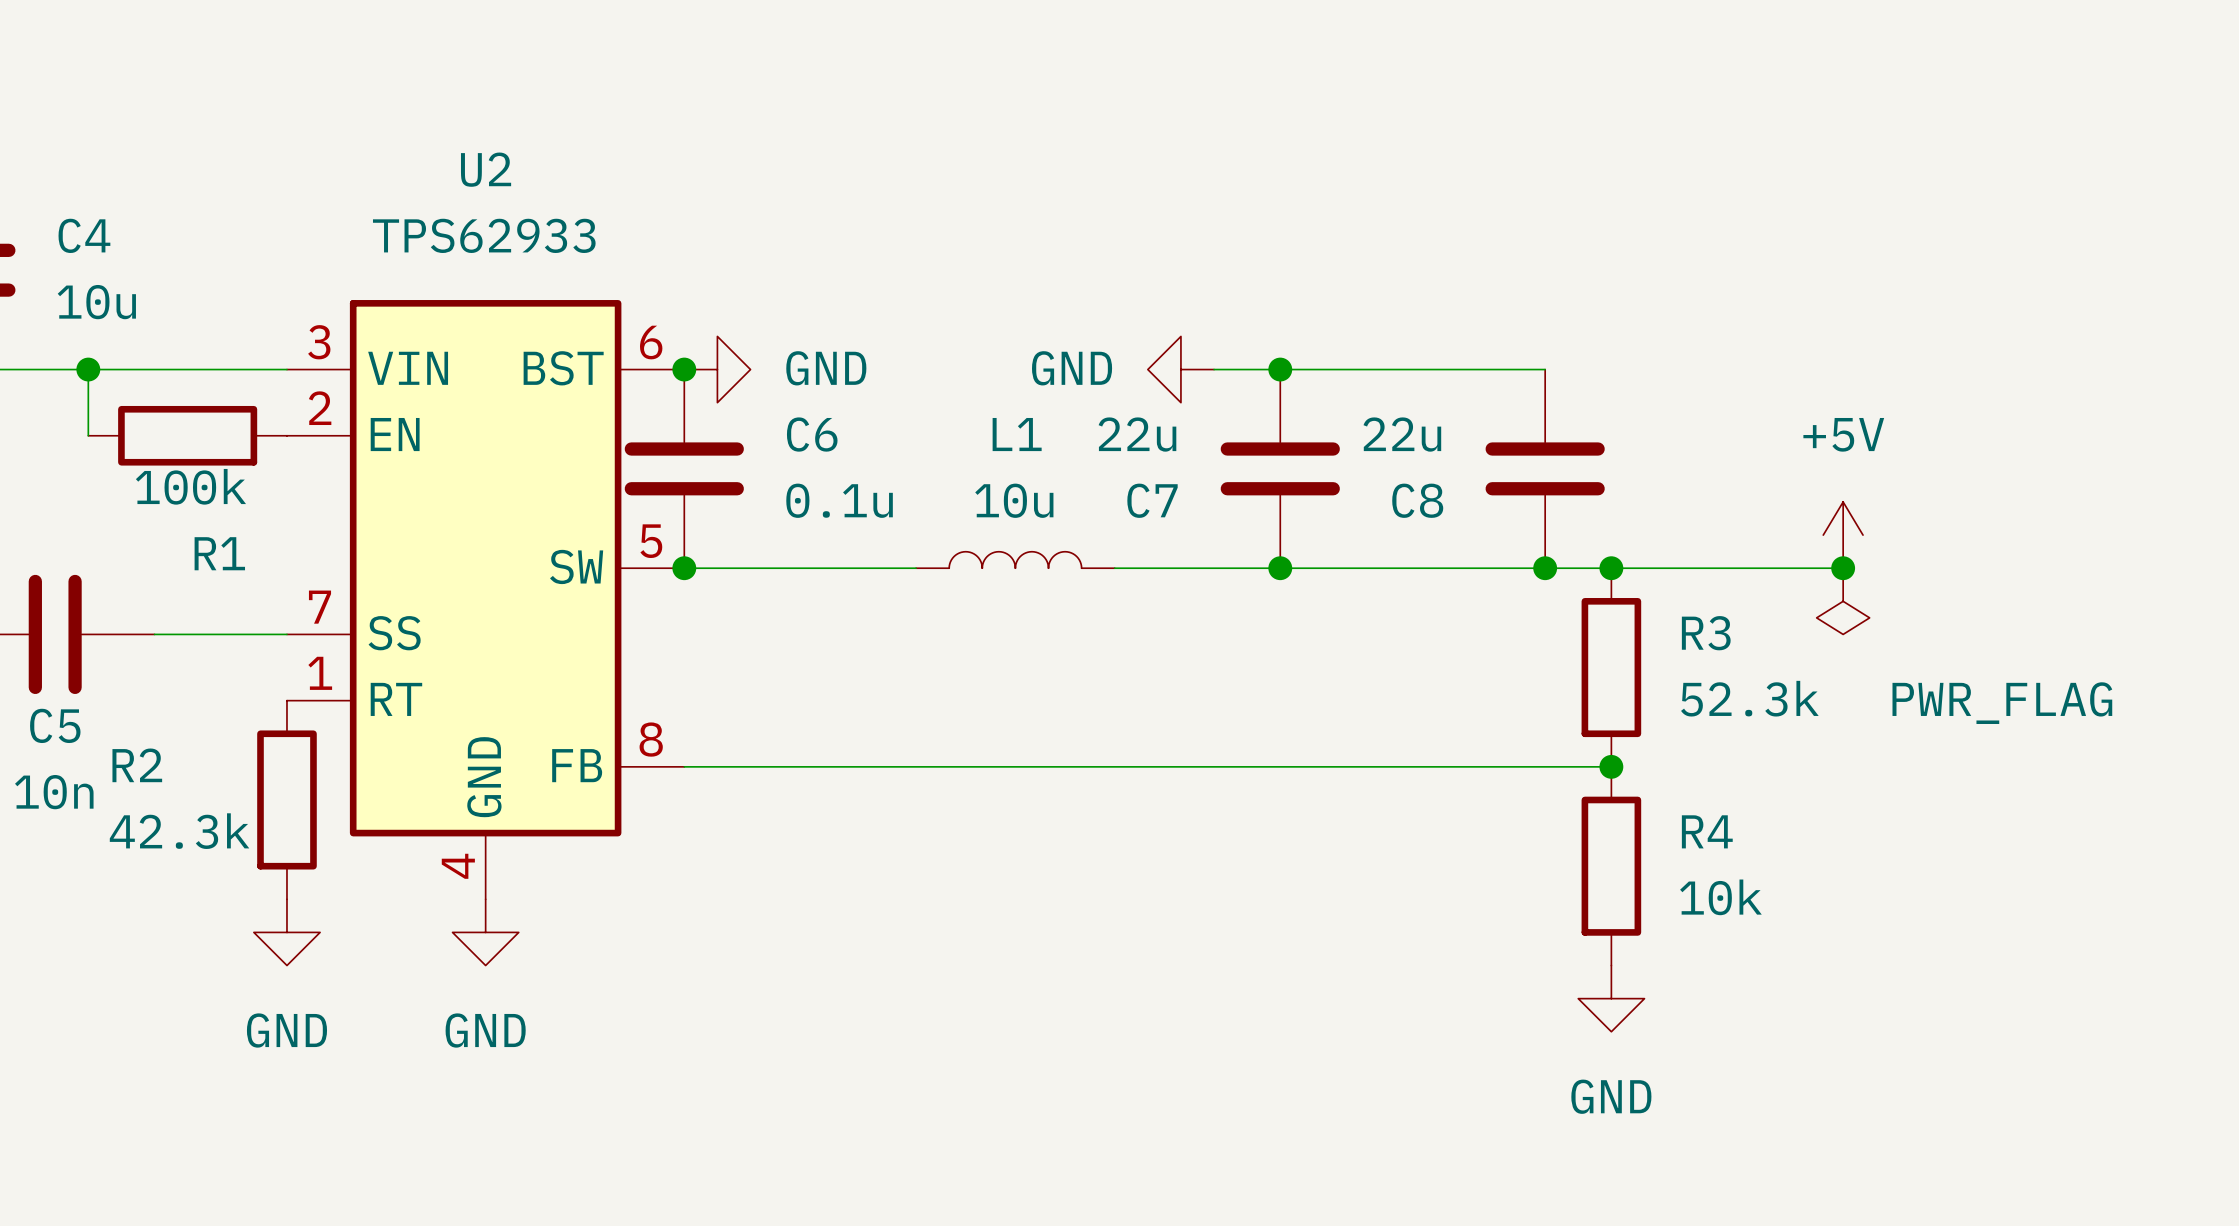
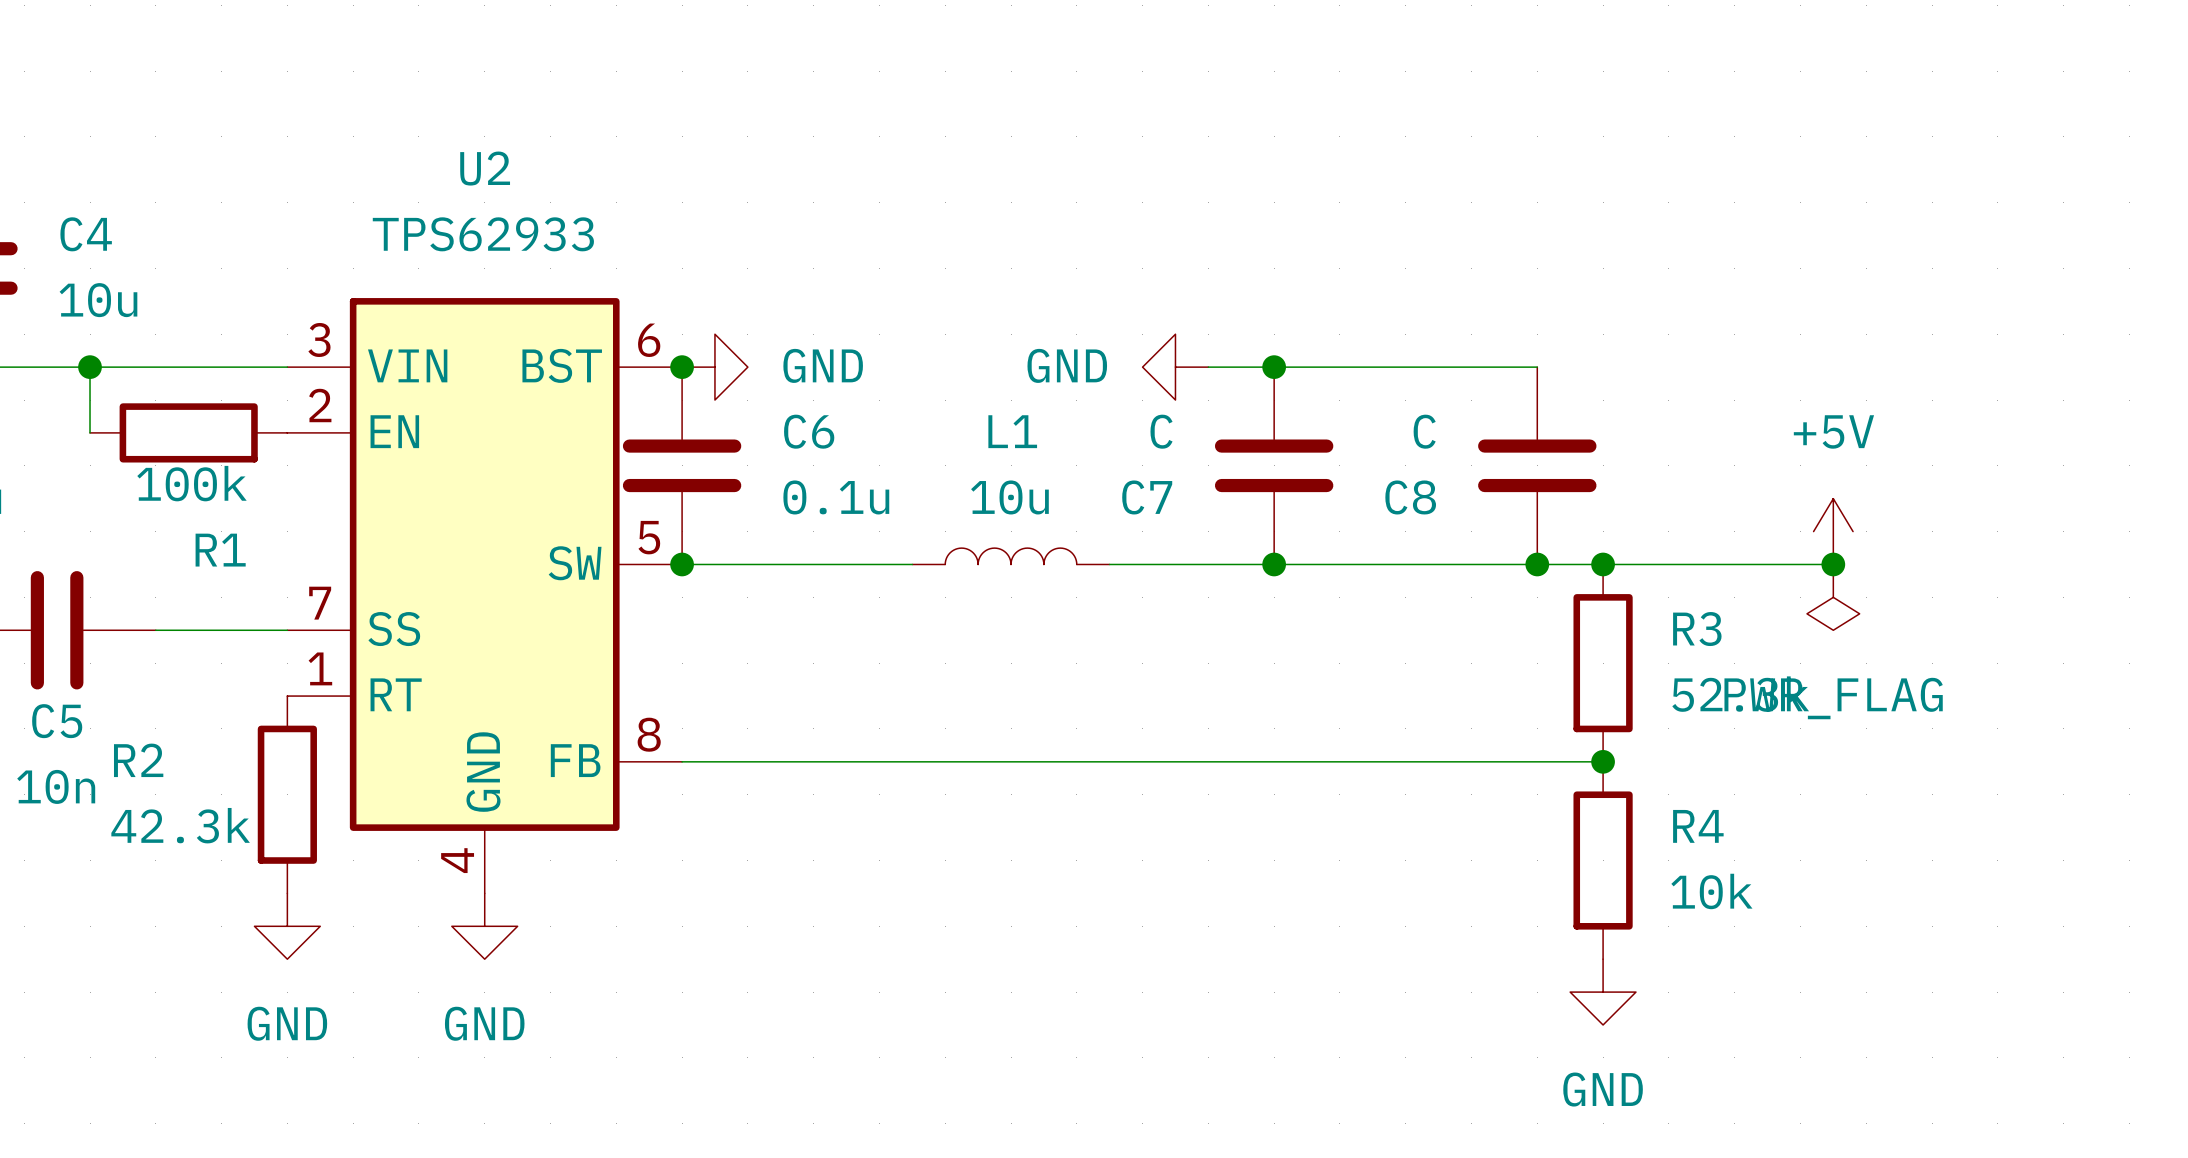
C7 value: 22u (1137, 434) -> C (1161, 431)
C8 value: 22u (1402, 434) -> C (1424, 431)
power symbol text position: PWR_FLAG (2002, 703) -> PWR_FLAG (1833, 698)

